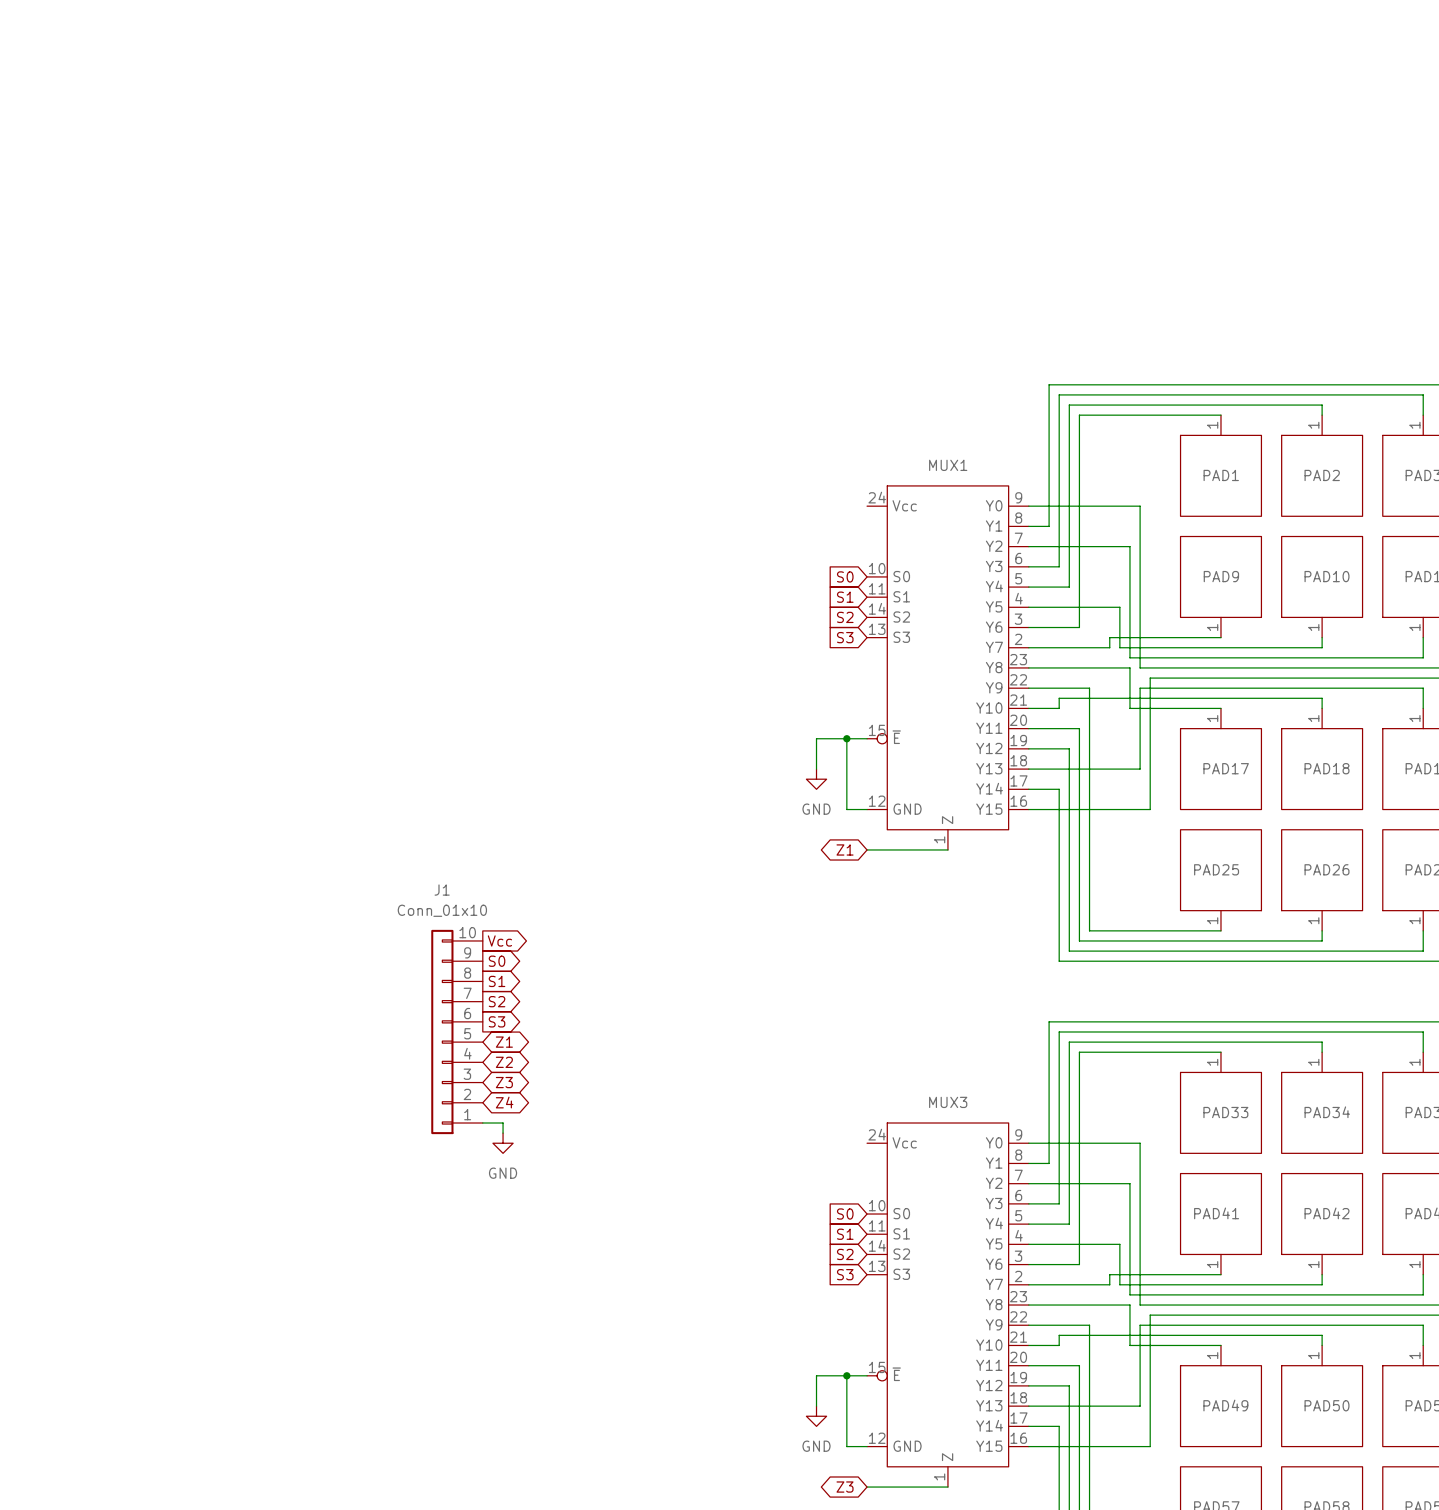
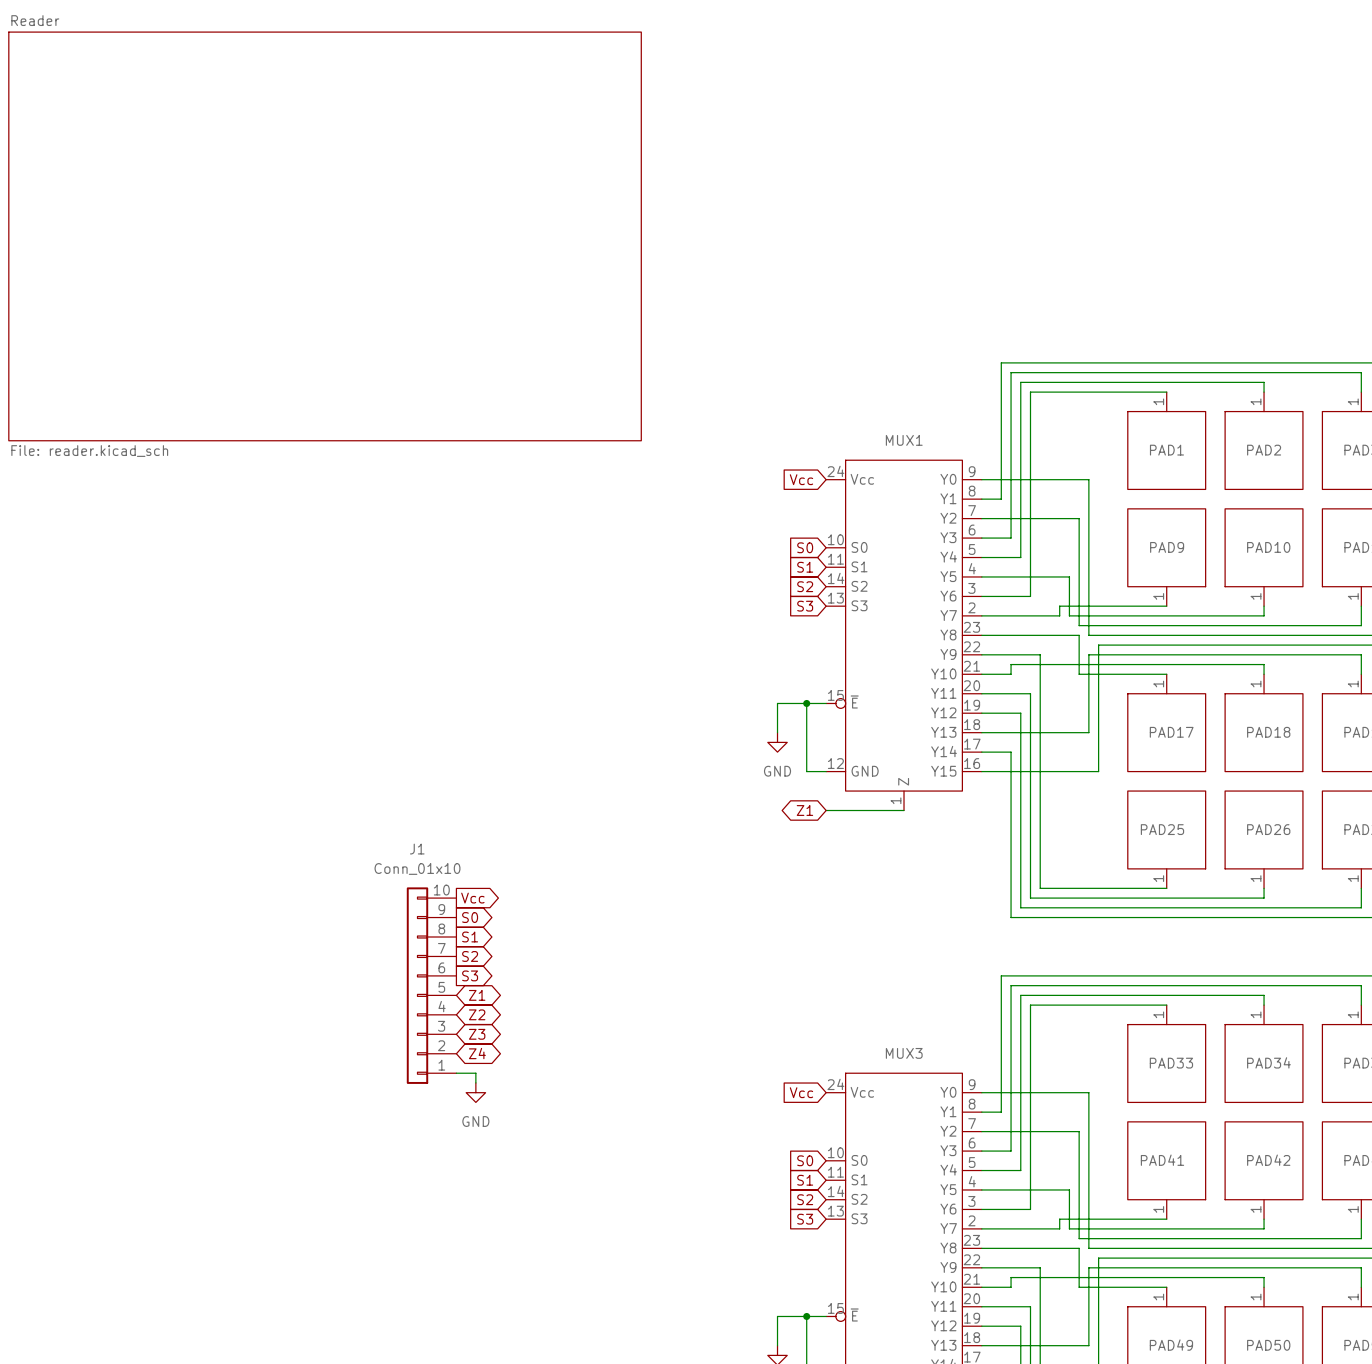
sheet Reader: none -> File: reader.kicad_sch (325, 236)
global label: none -> Vcc (801, 479)
global label: none -> Vcc (801, 1092)

